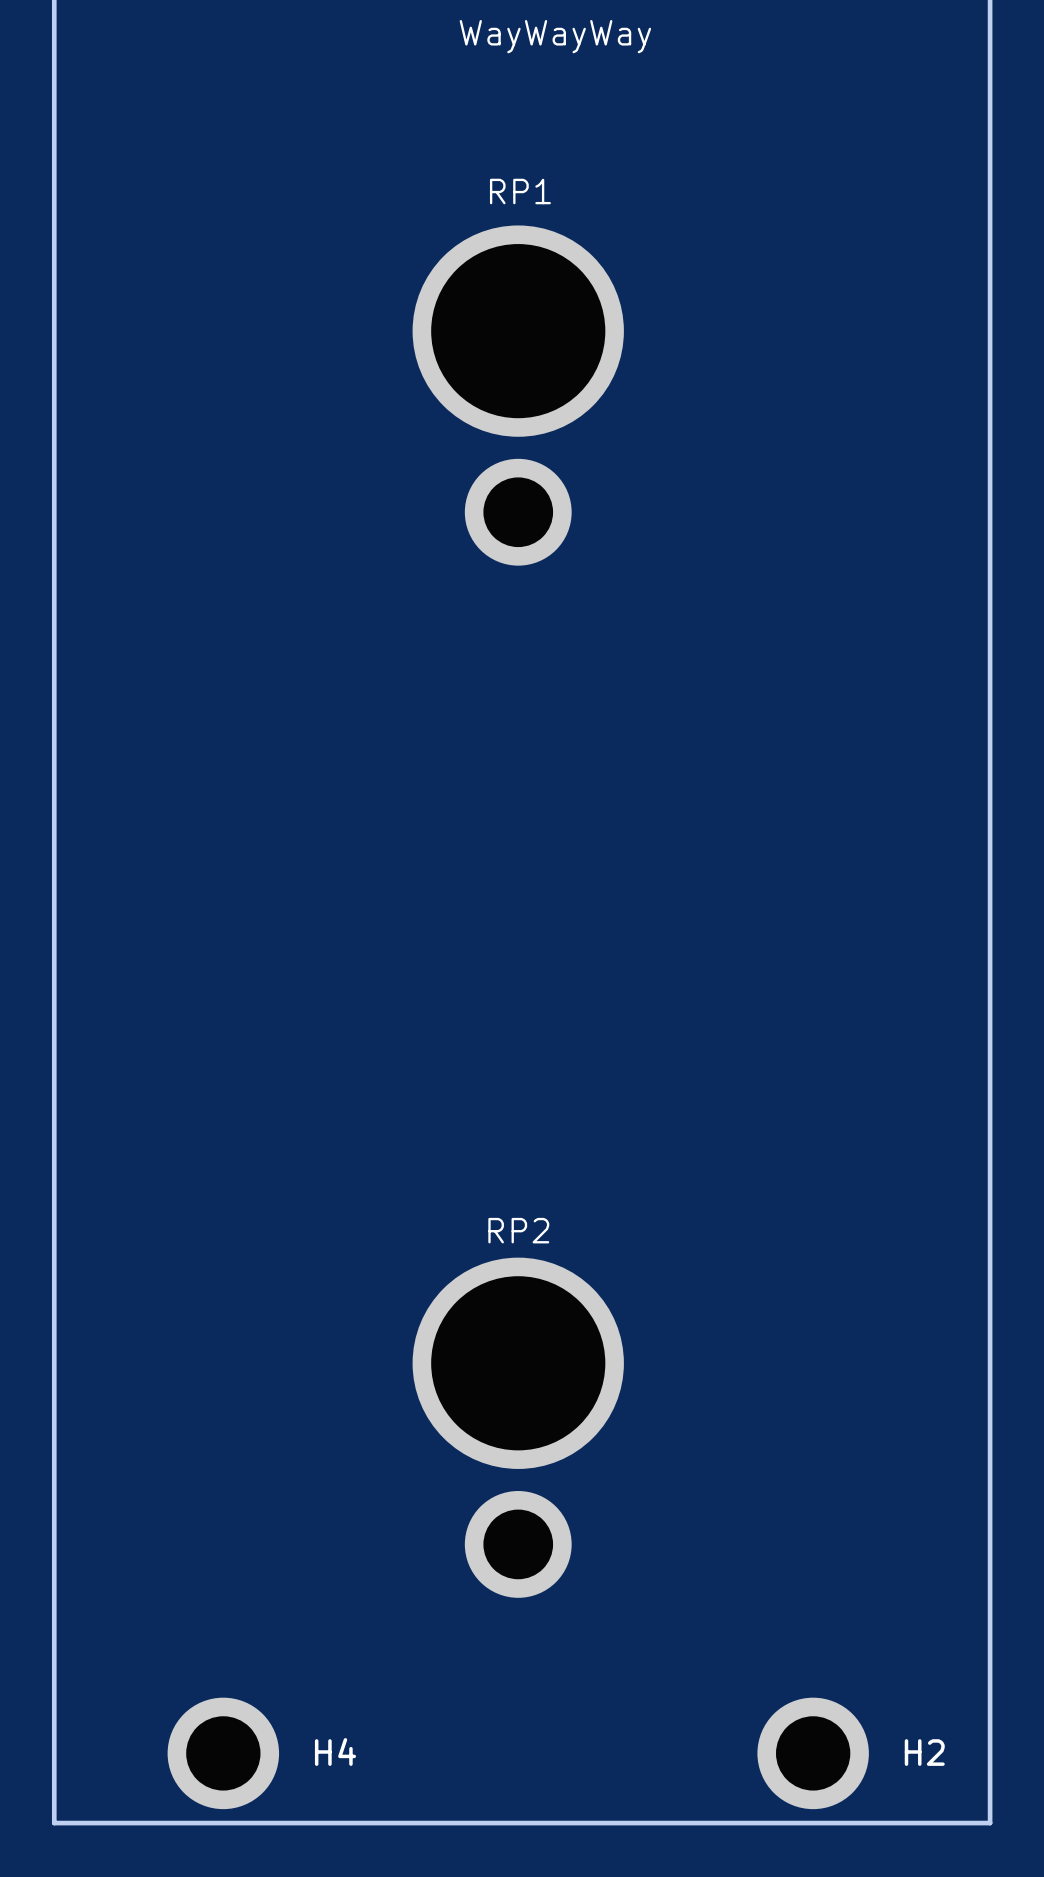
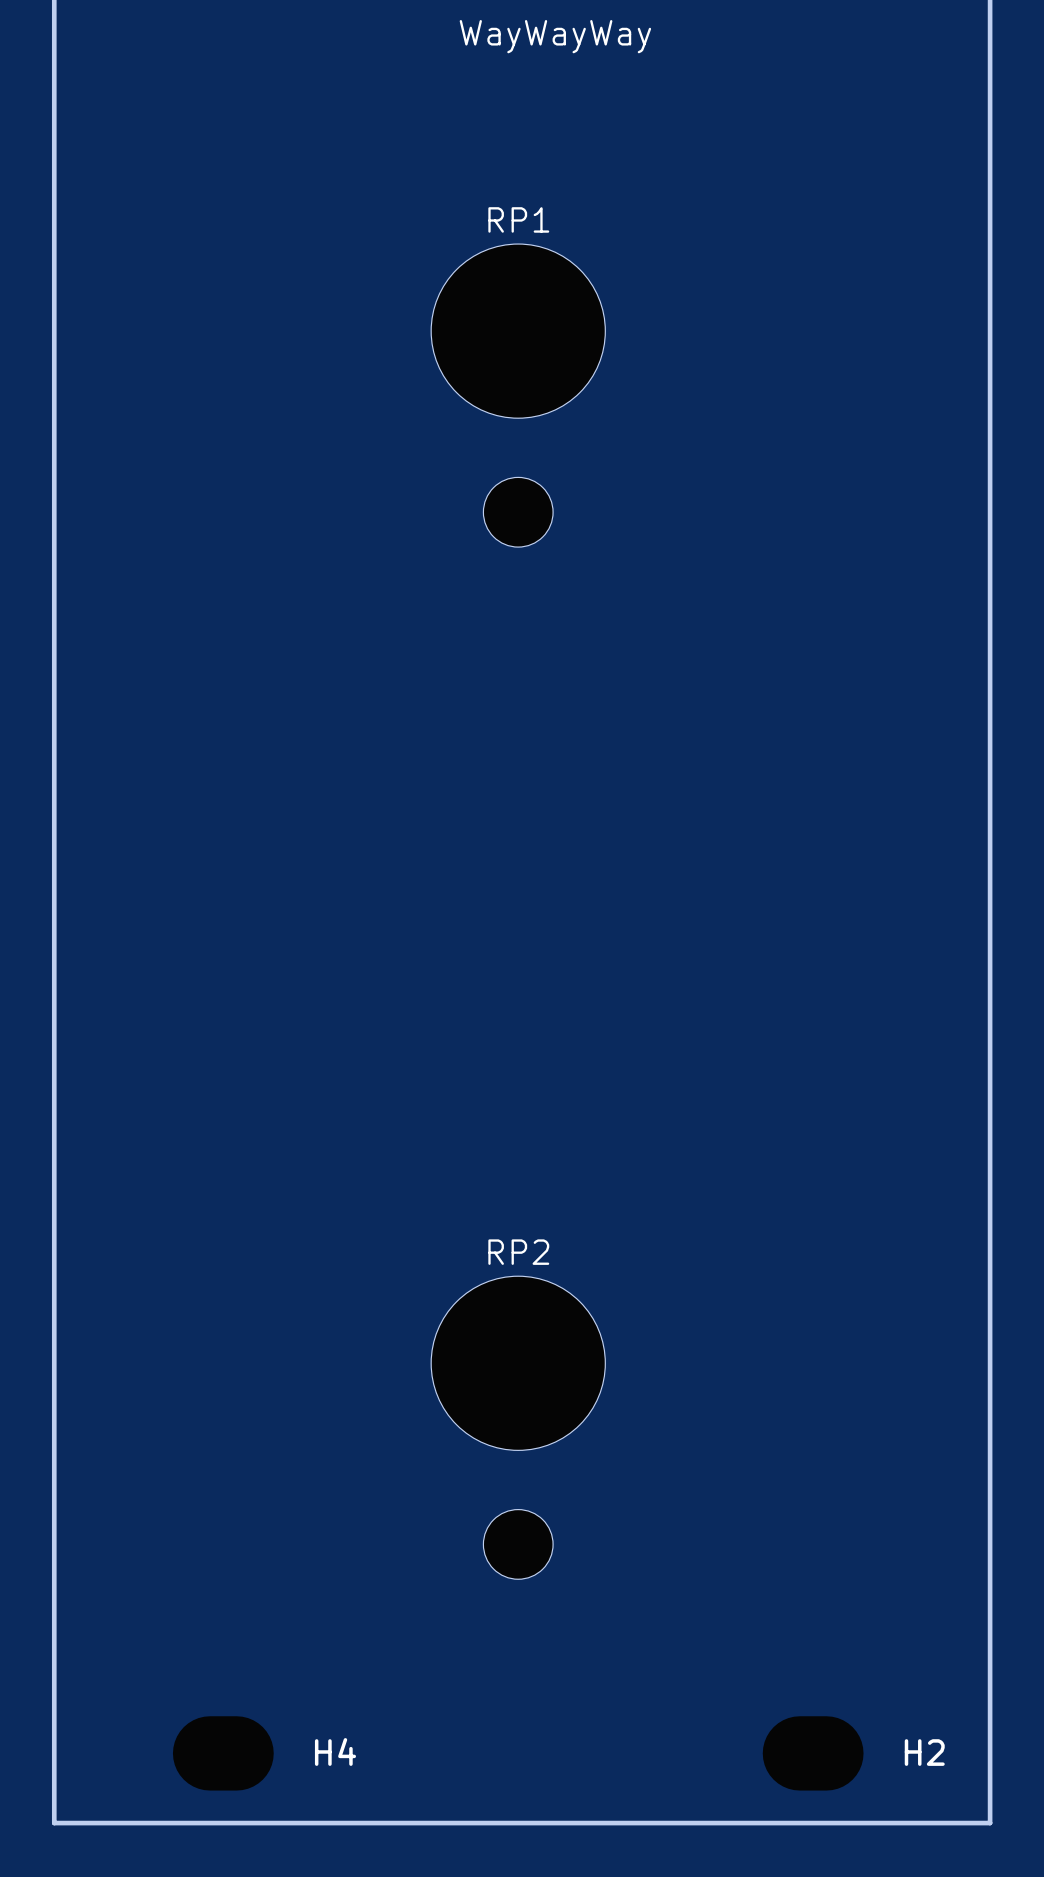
RP1 footprint: [412, 225, 624, 566] -> [431, 244, 606, 548]
RP2 footprint: [412, 1257, 624, 1598] -> [431, 1276, 606, 1580]
H4 footprint: [167, 1697, 280, 1810] -> [172, 1716, 274, 1791]
H2 footprint: [757, 1697, 869, 1810] -> [762, 1716, 864, 1791]

